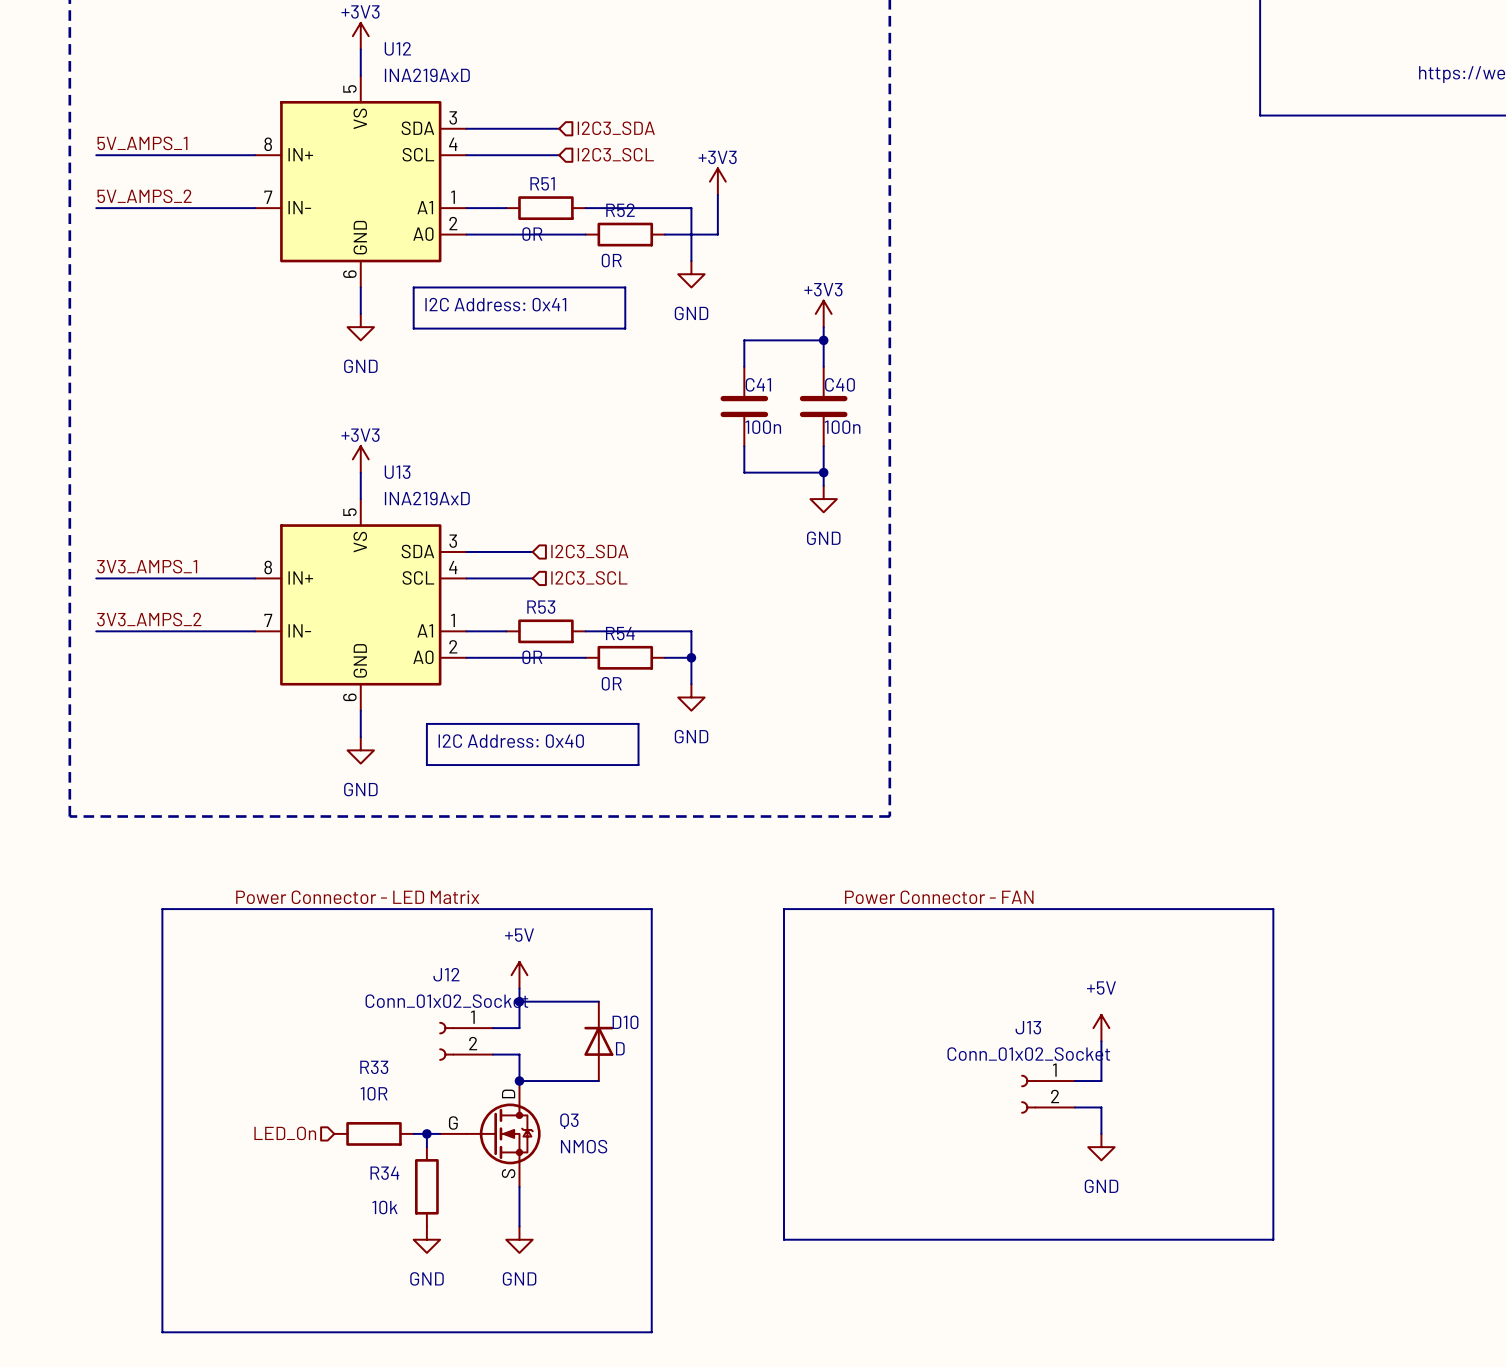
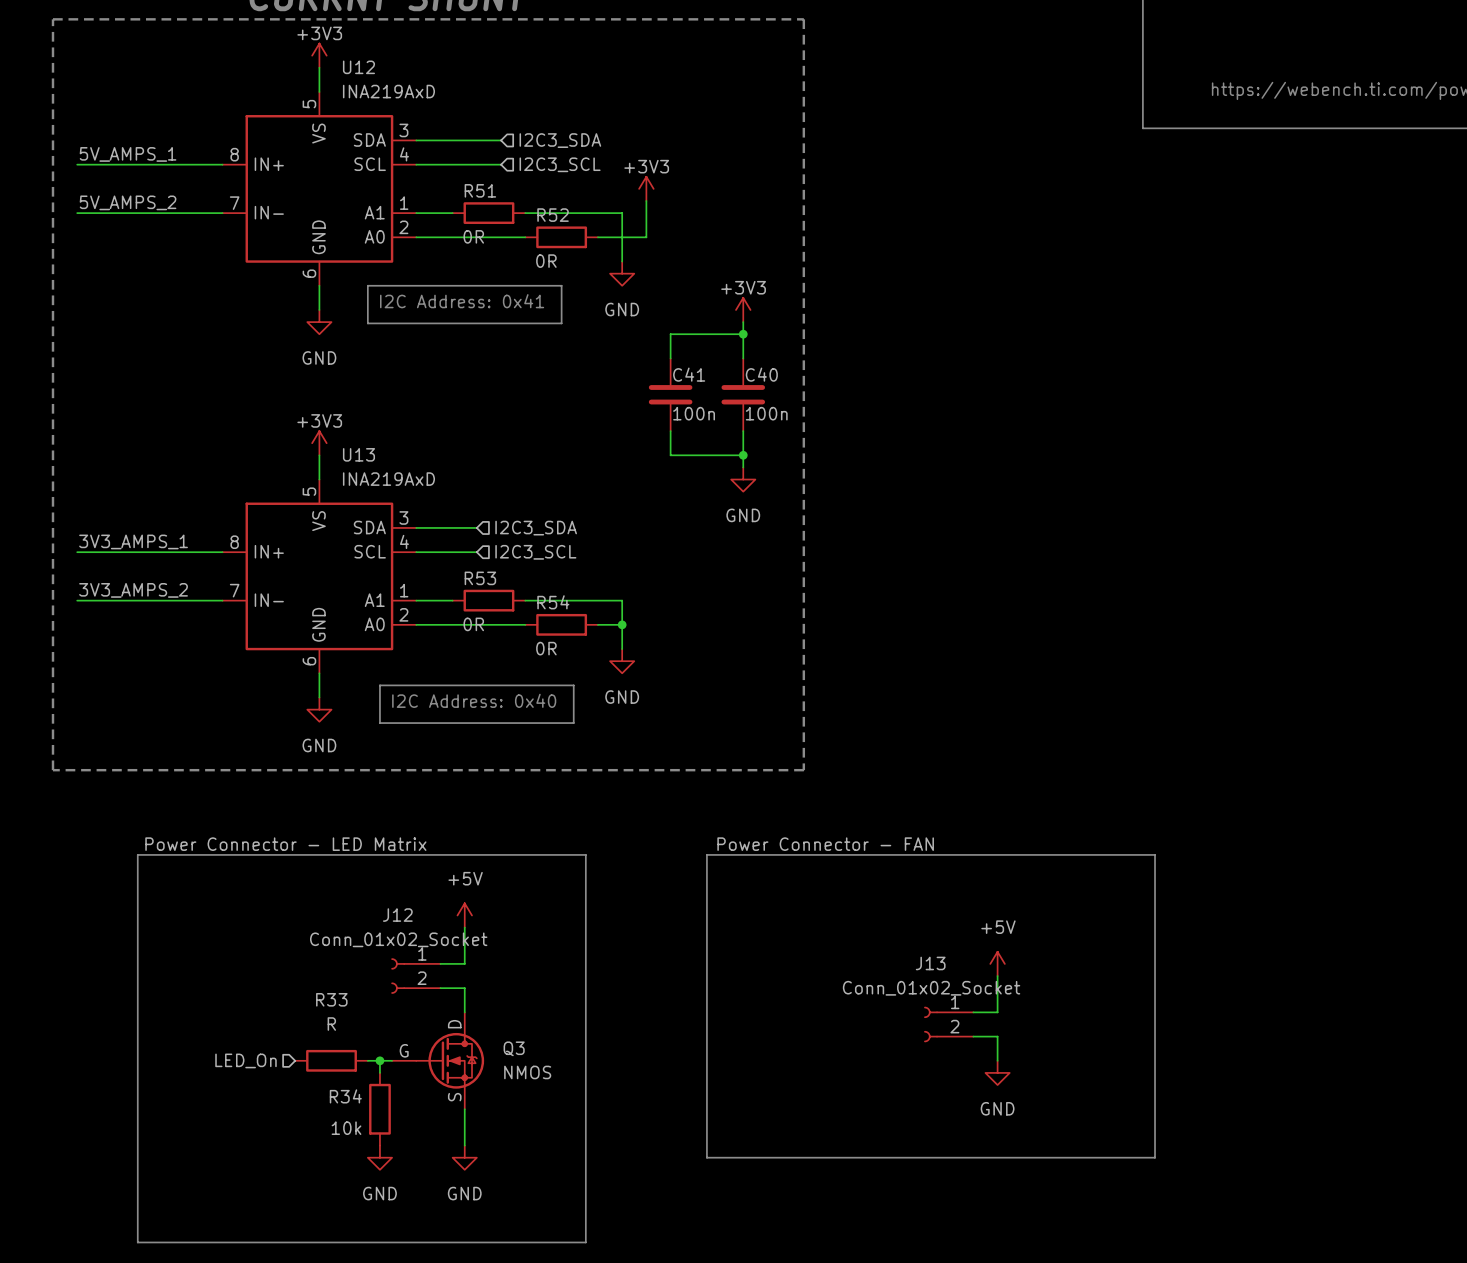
wire: (519, 1001) (598, 1001) -> none
junction: (519, 1001) -> none
D10: D (598, 1041) -> none
wire: (519, 1081) (598, 1081) -> none
junction: (519, 1081) -> none
R33 value: 10R (374, 1093) -> R (331, 1024)

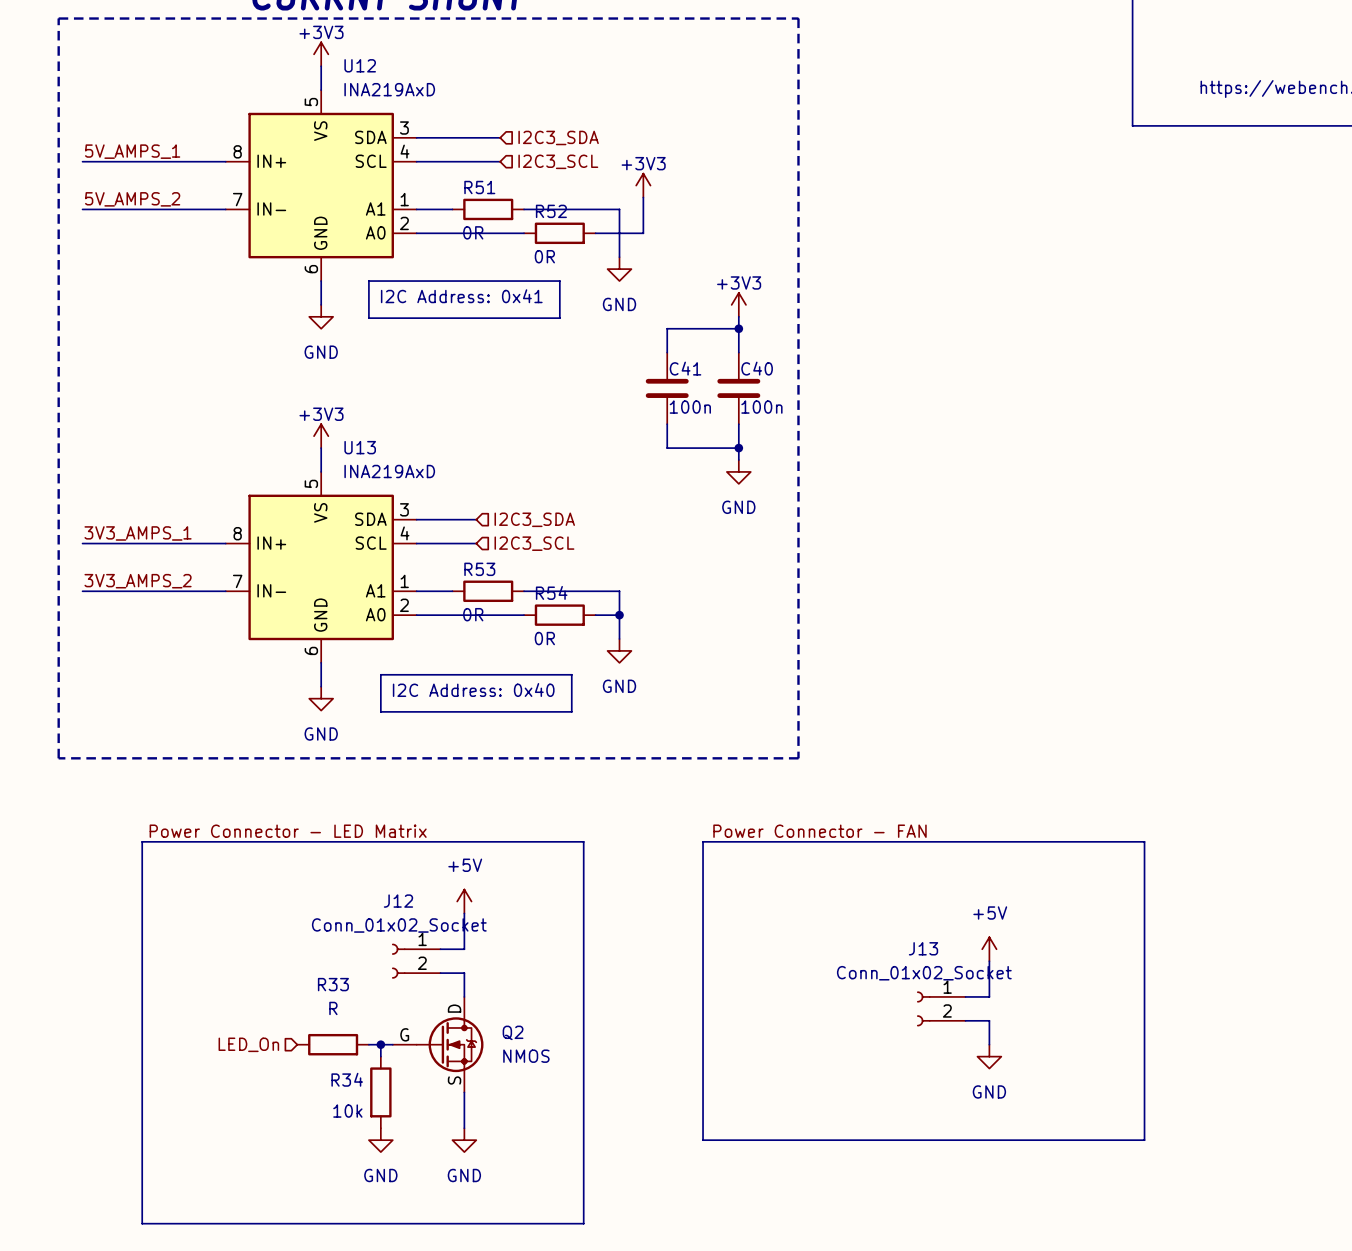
Q3 name: Q3 (514, 1048) -> Q2 (513, 1032)

